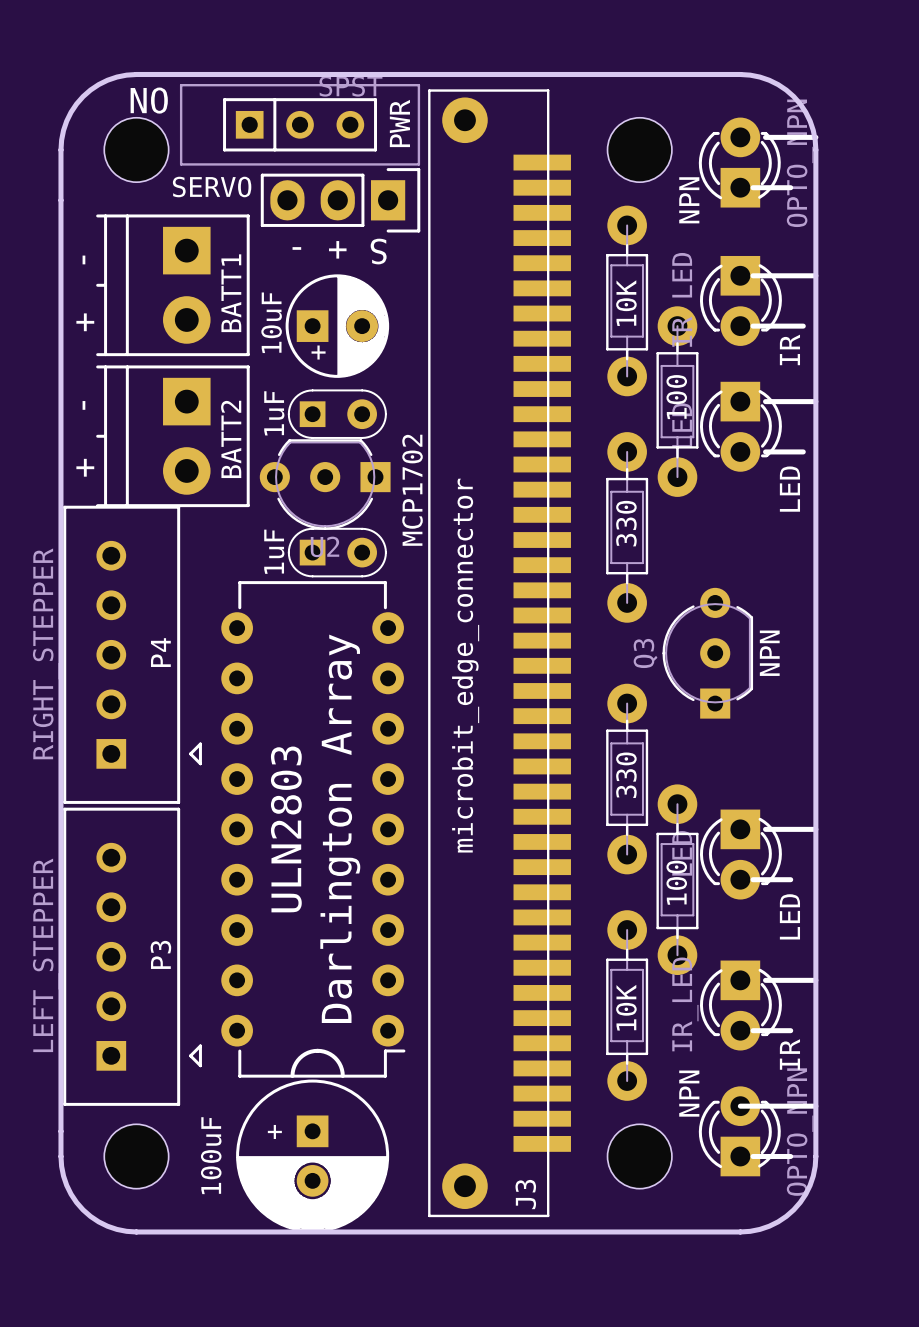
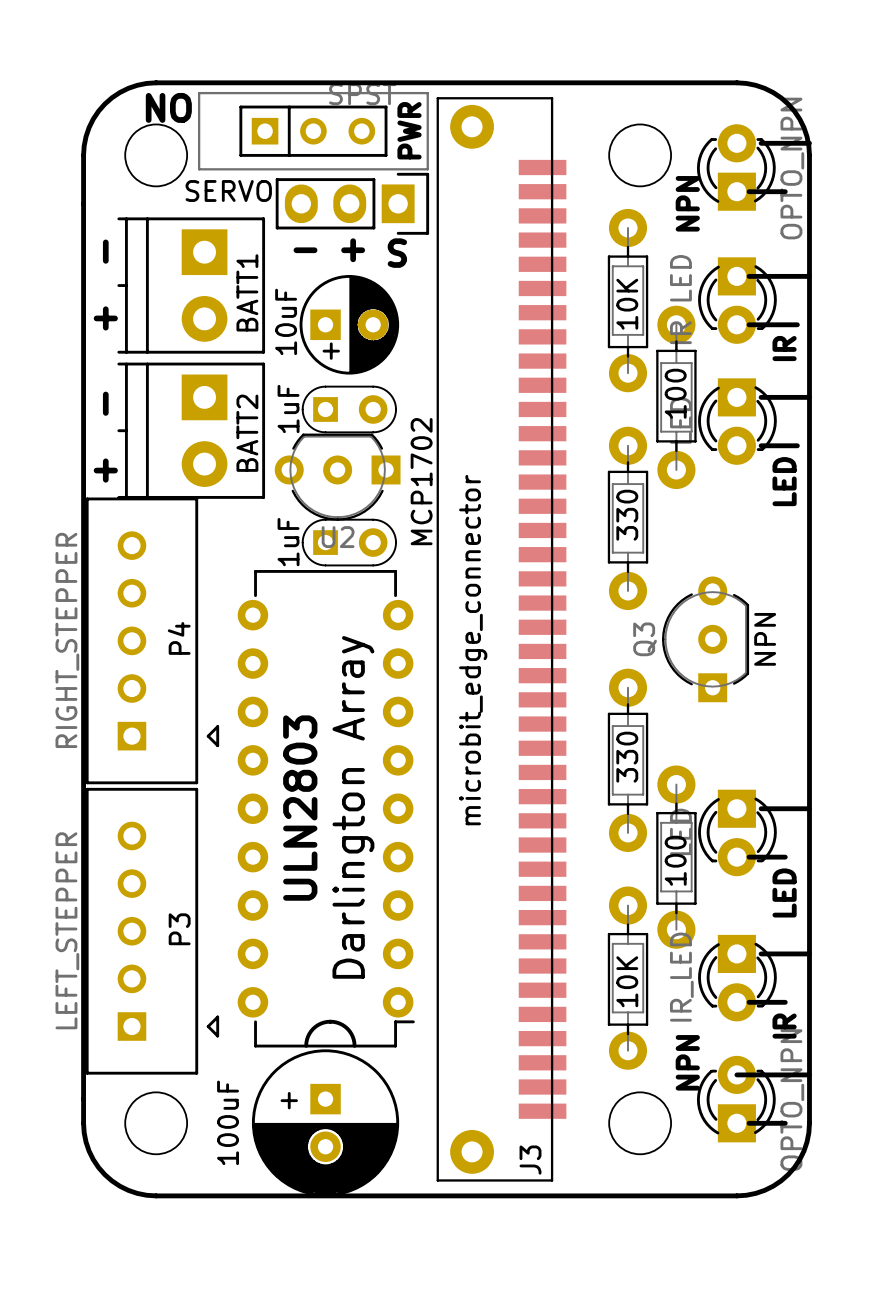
J3 footprint: [428, 89, 571, 1218] -> [436, 97, 567, 1182]

